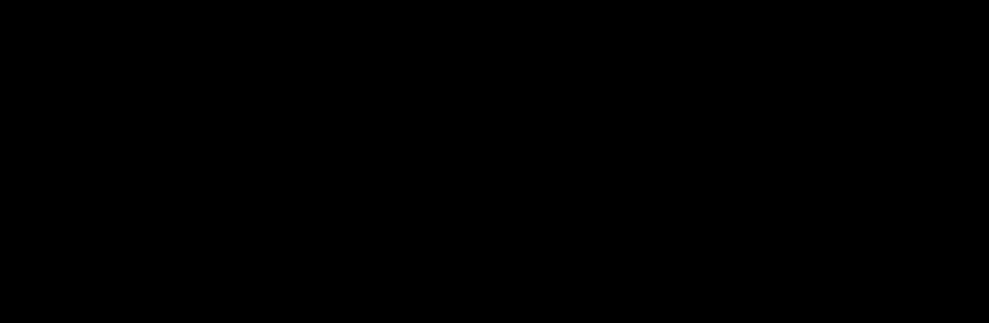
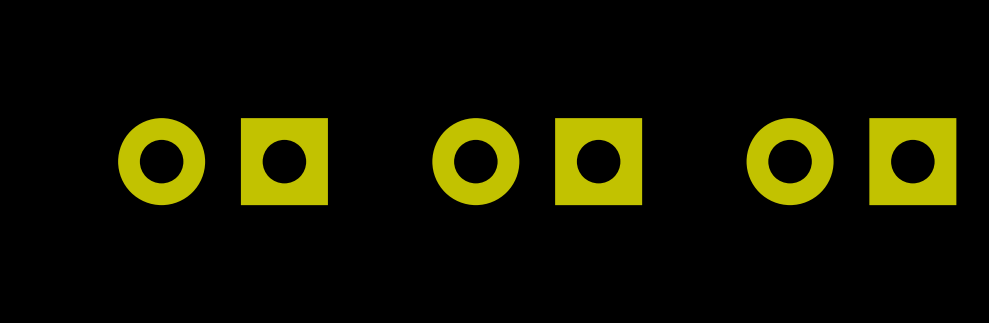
part: none -> (223, 161)
part: none -> (537, 161)
part: none -> (851, 161)

